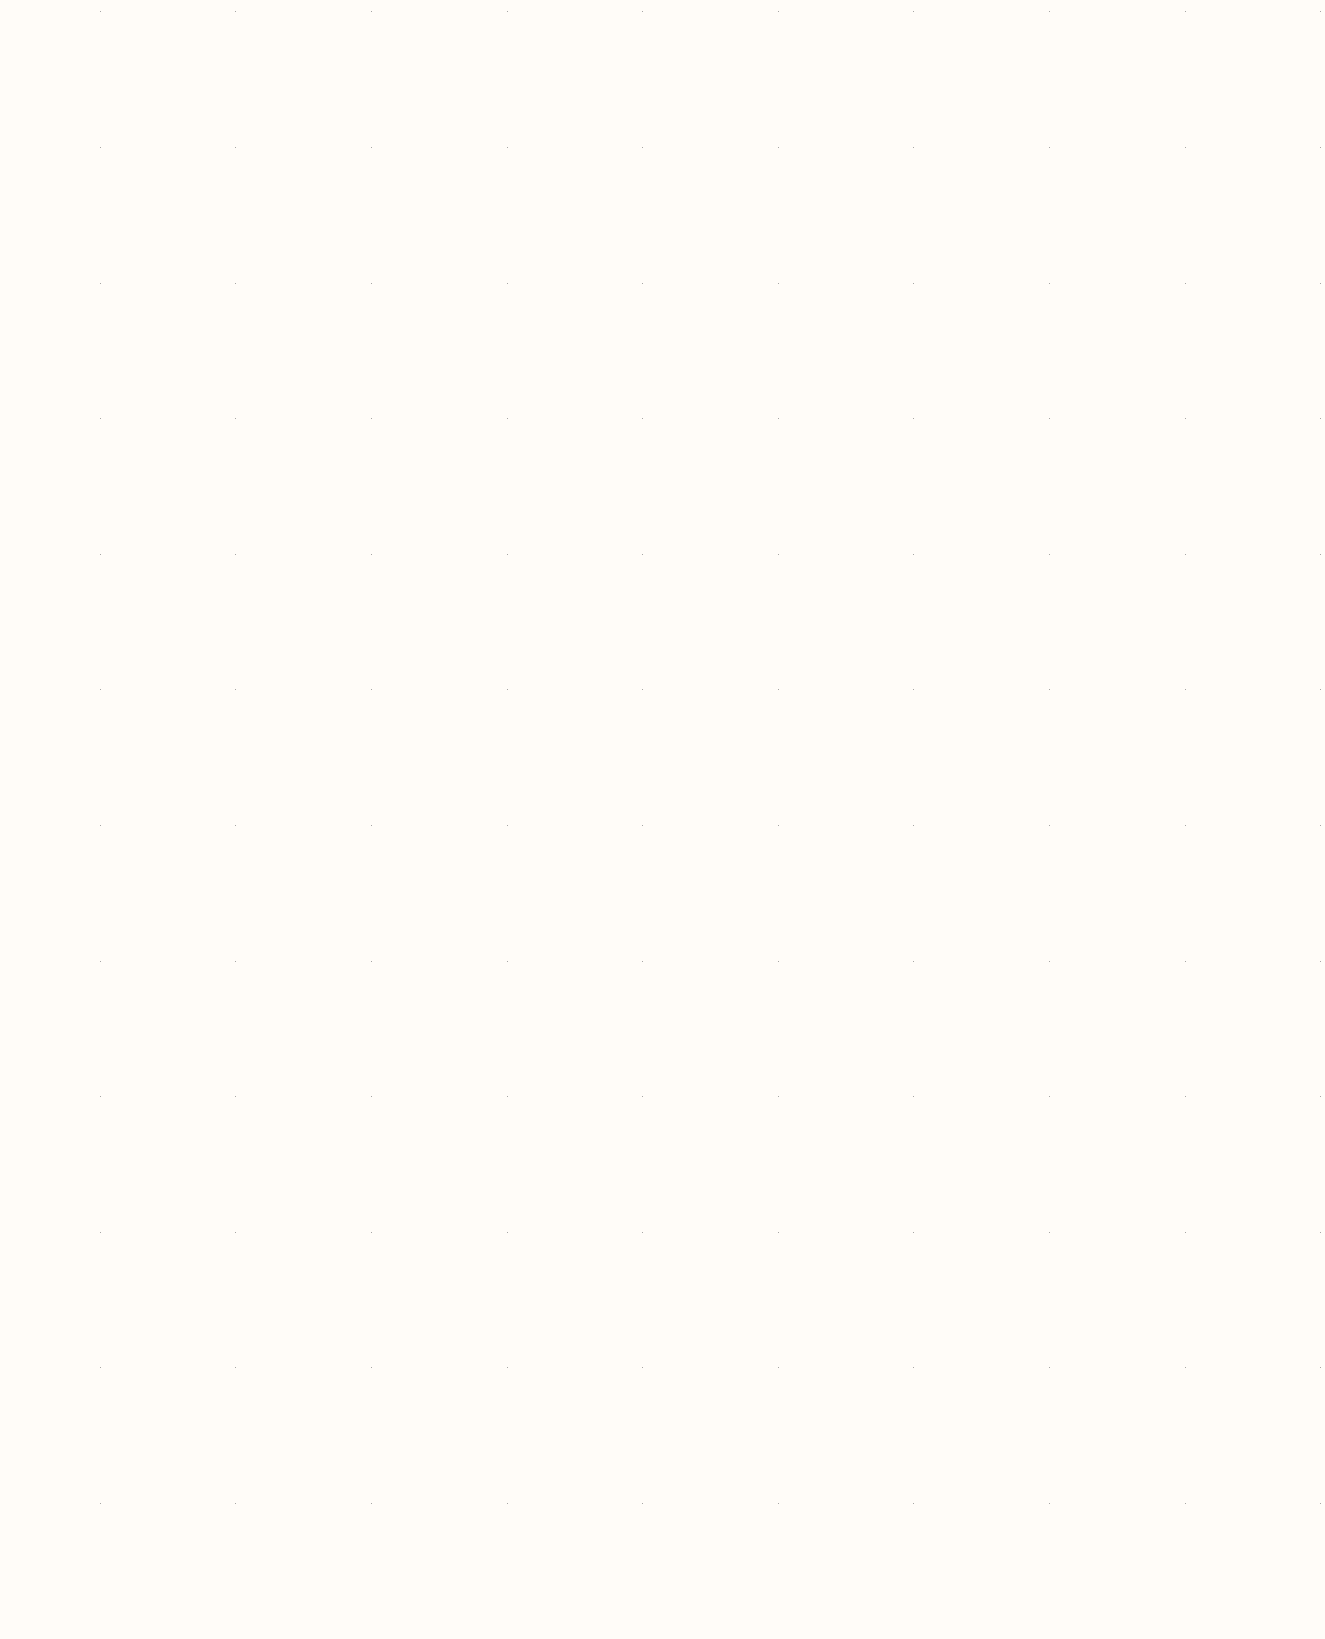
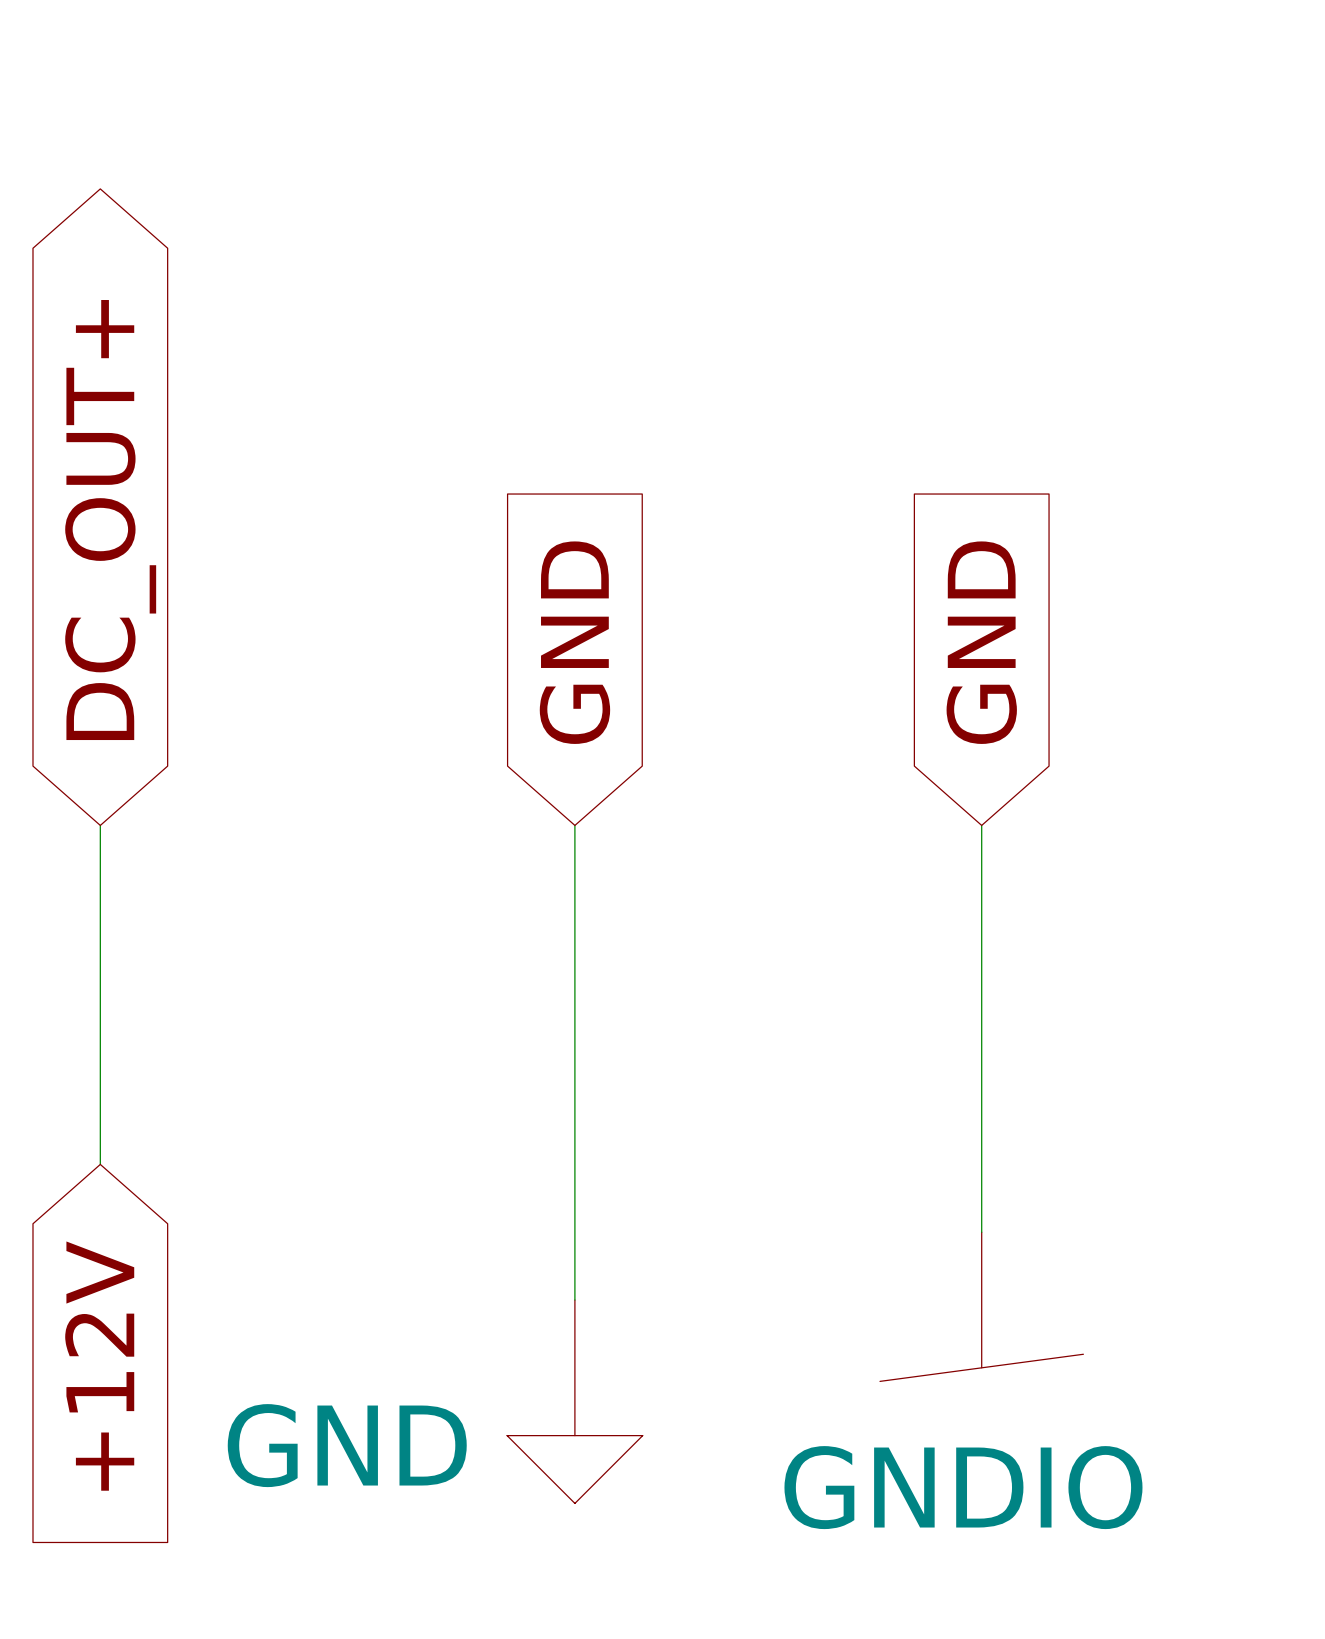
global label: none -> DC_OUT+ (110, 520)
global label: none -> GND (574, 642)
global label: none -> GND (981, 642)
wire: none -> (100, 825) (100, 1164)
wire: none -> (574, 825) (574, 1300)
wire: none -> (981, 825) (981, 1232)
power symbol: none -> GNDIO (981, 1306)
global label: none -> +12V (99, 1366)
power symbol: none -> GND (574, 1401)

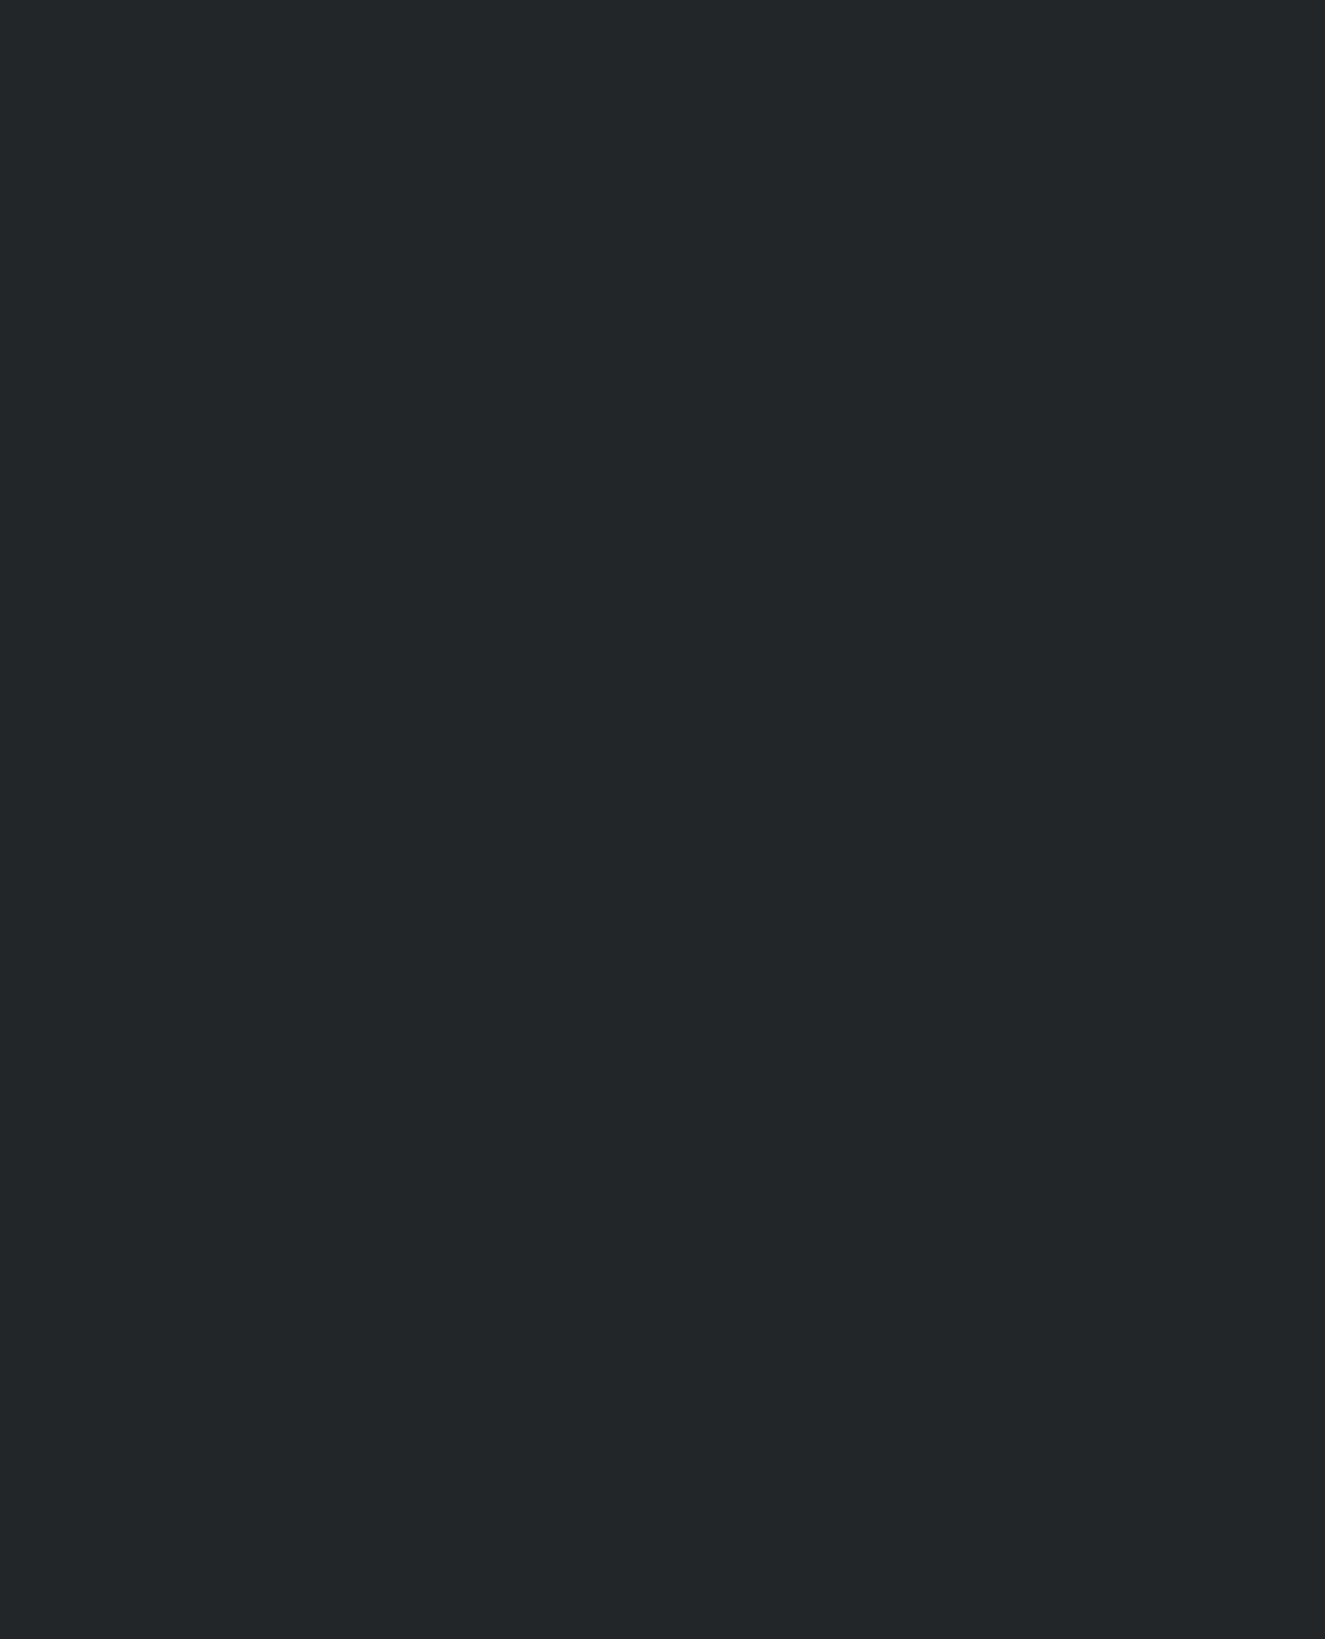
global label: DC_OUT+ (110, 520) -> none
global label: GND (574, 642) -> none
global label: GND (981, 642) -> none
wire: (100, 825) (100, 1164) -> none
wire: (574, 825) (574, 1300) -> none
wire: (981, 825) (981, 1232) -> none
power symbol: GNDIO (981, 1306) -> none
global label: +12V (99, 1366) -> none
power symbol: GND (574, 1401) -> none

